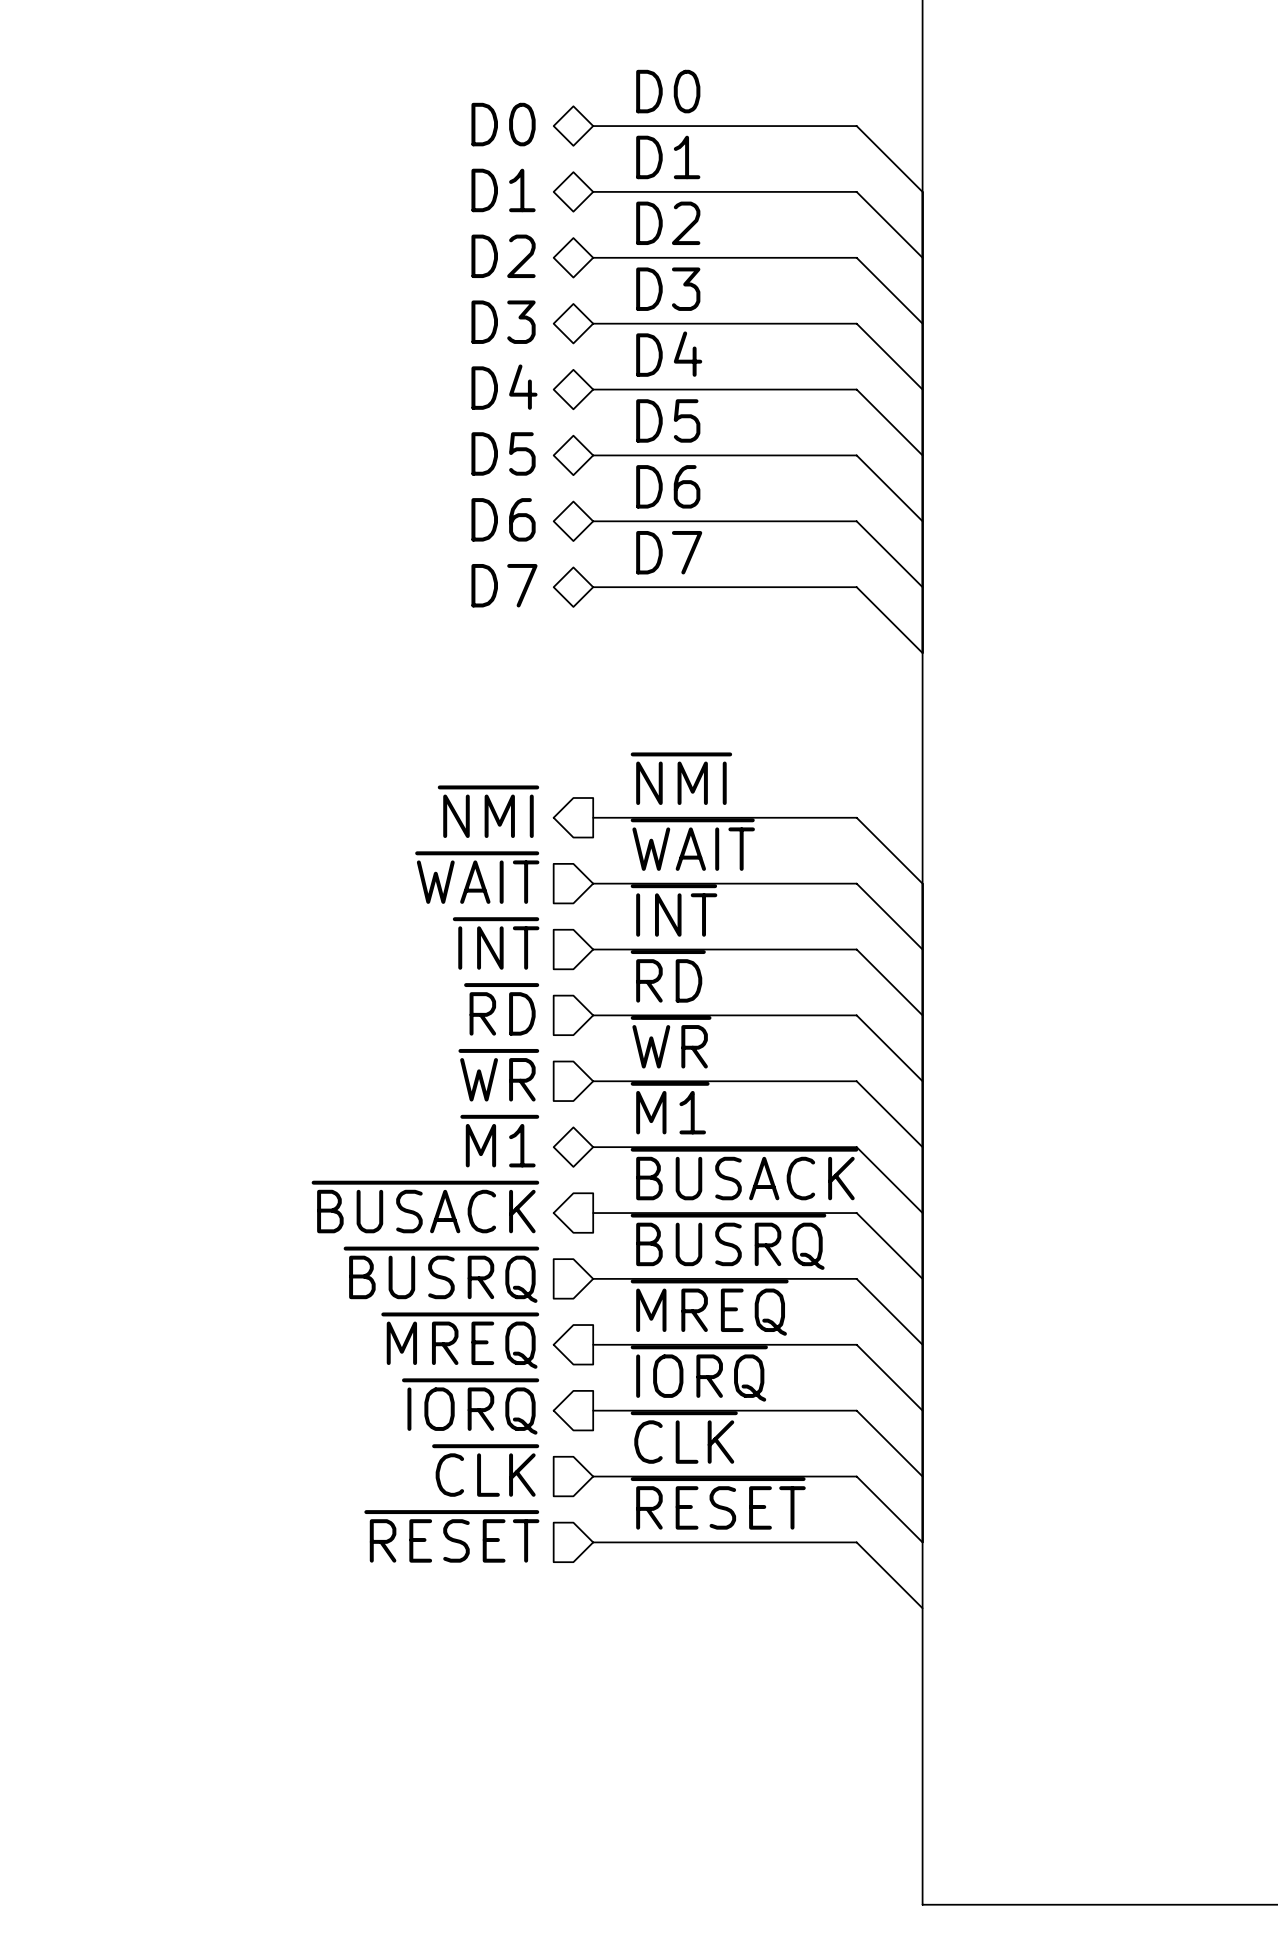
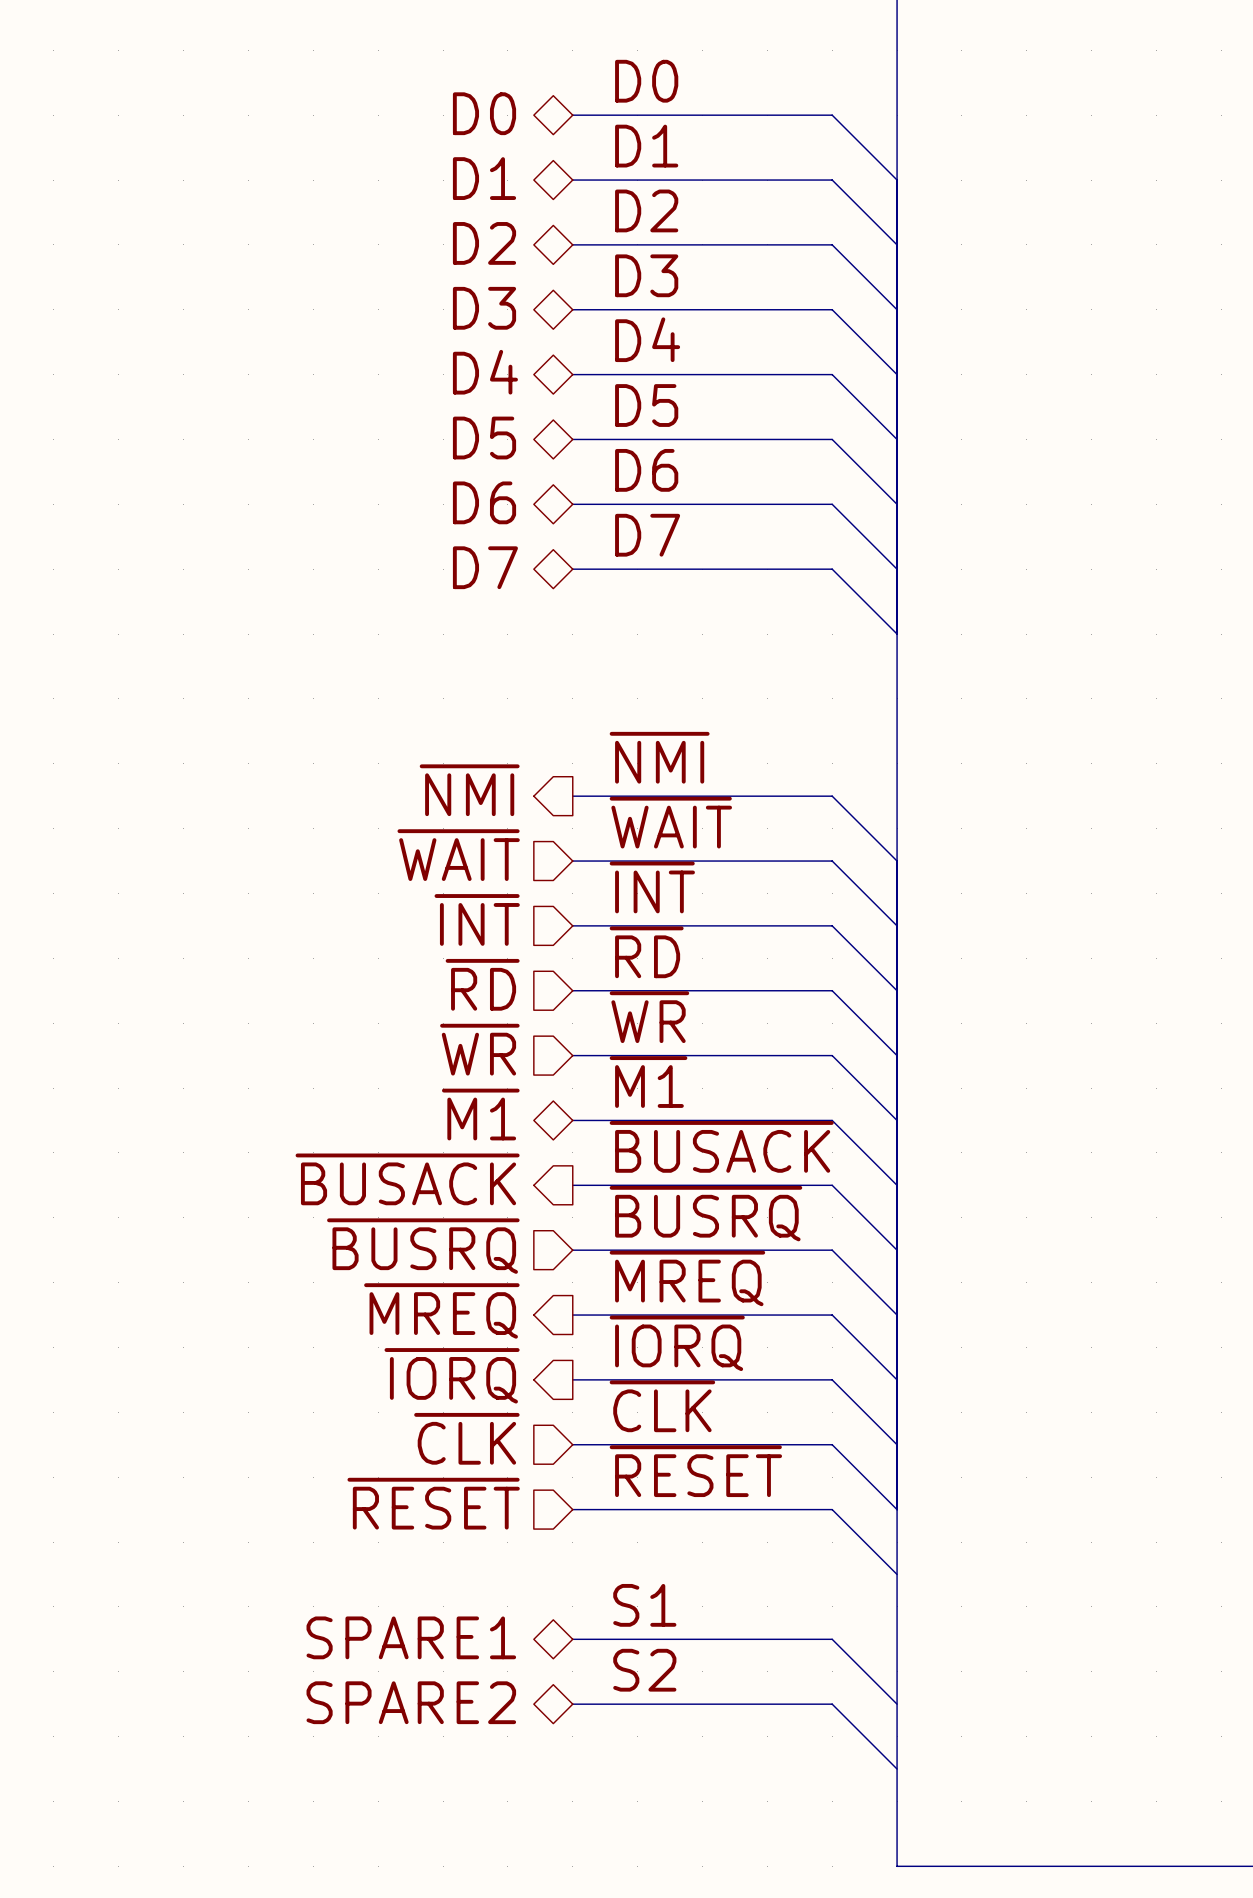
label: none -> S1 (644, 1605)
hierarchical label: none -> SPARE1 (411, 1637)
wire: none -> (572, 1639) (832, 1639) (897, 1704)
label: none -> S2 (644, 1670)
hierarchical label: none -> SPARE2 (411, 1702)
wire: none -> (572, 1704) (832, 1704) (897, 1769)

